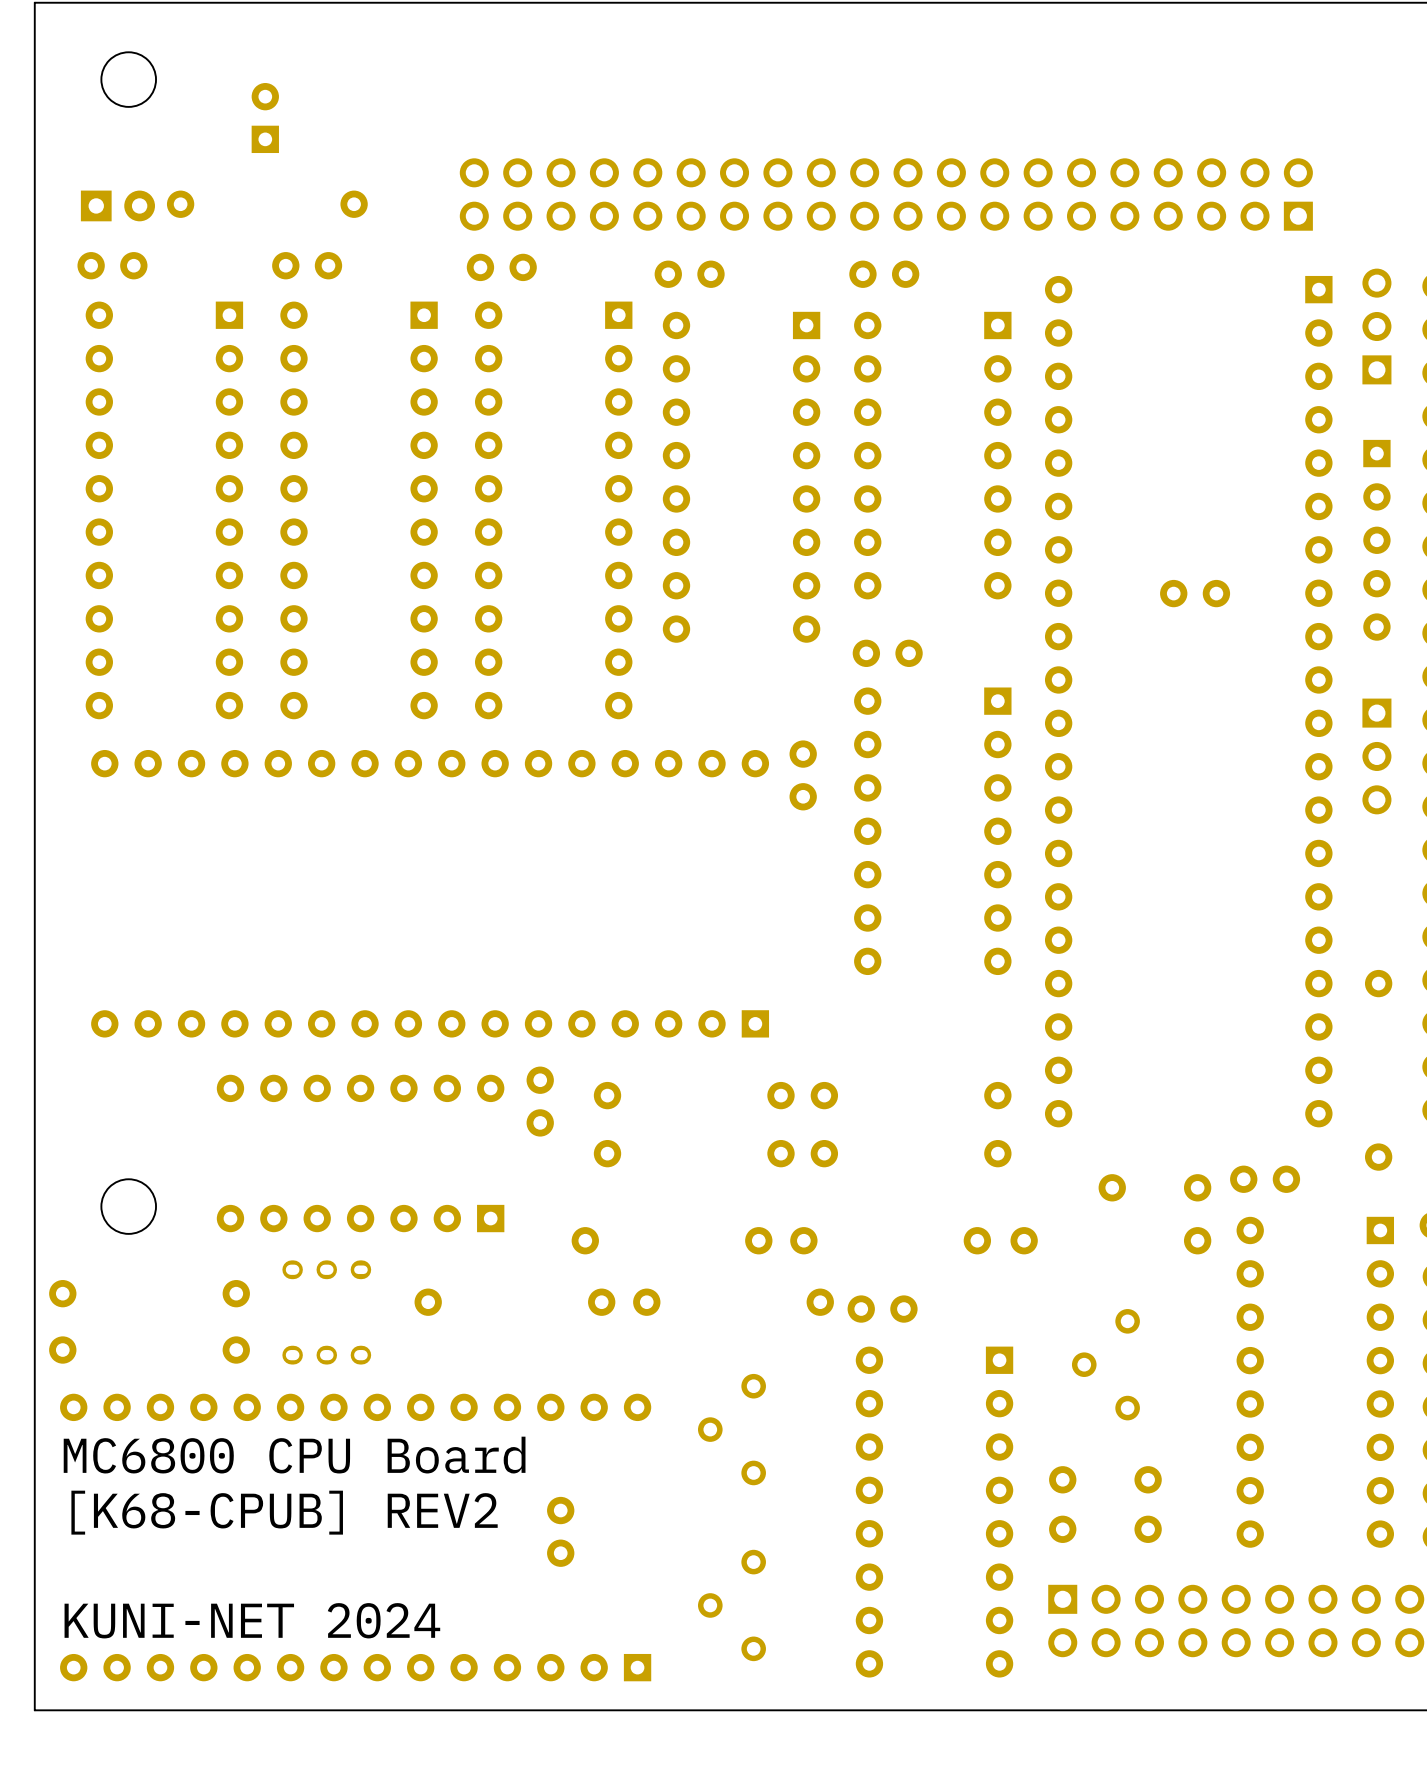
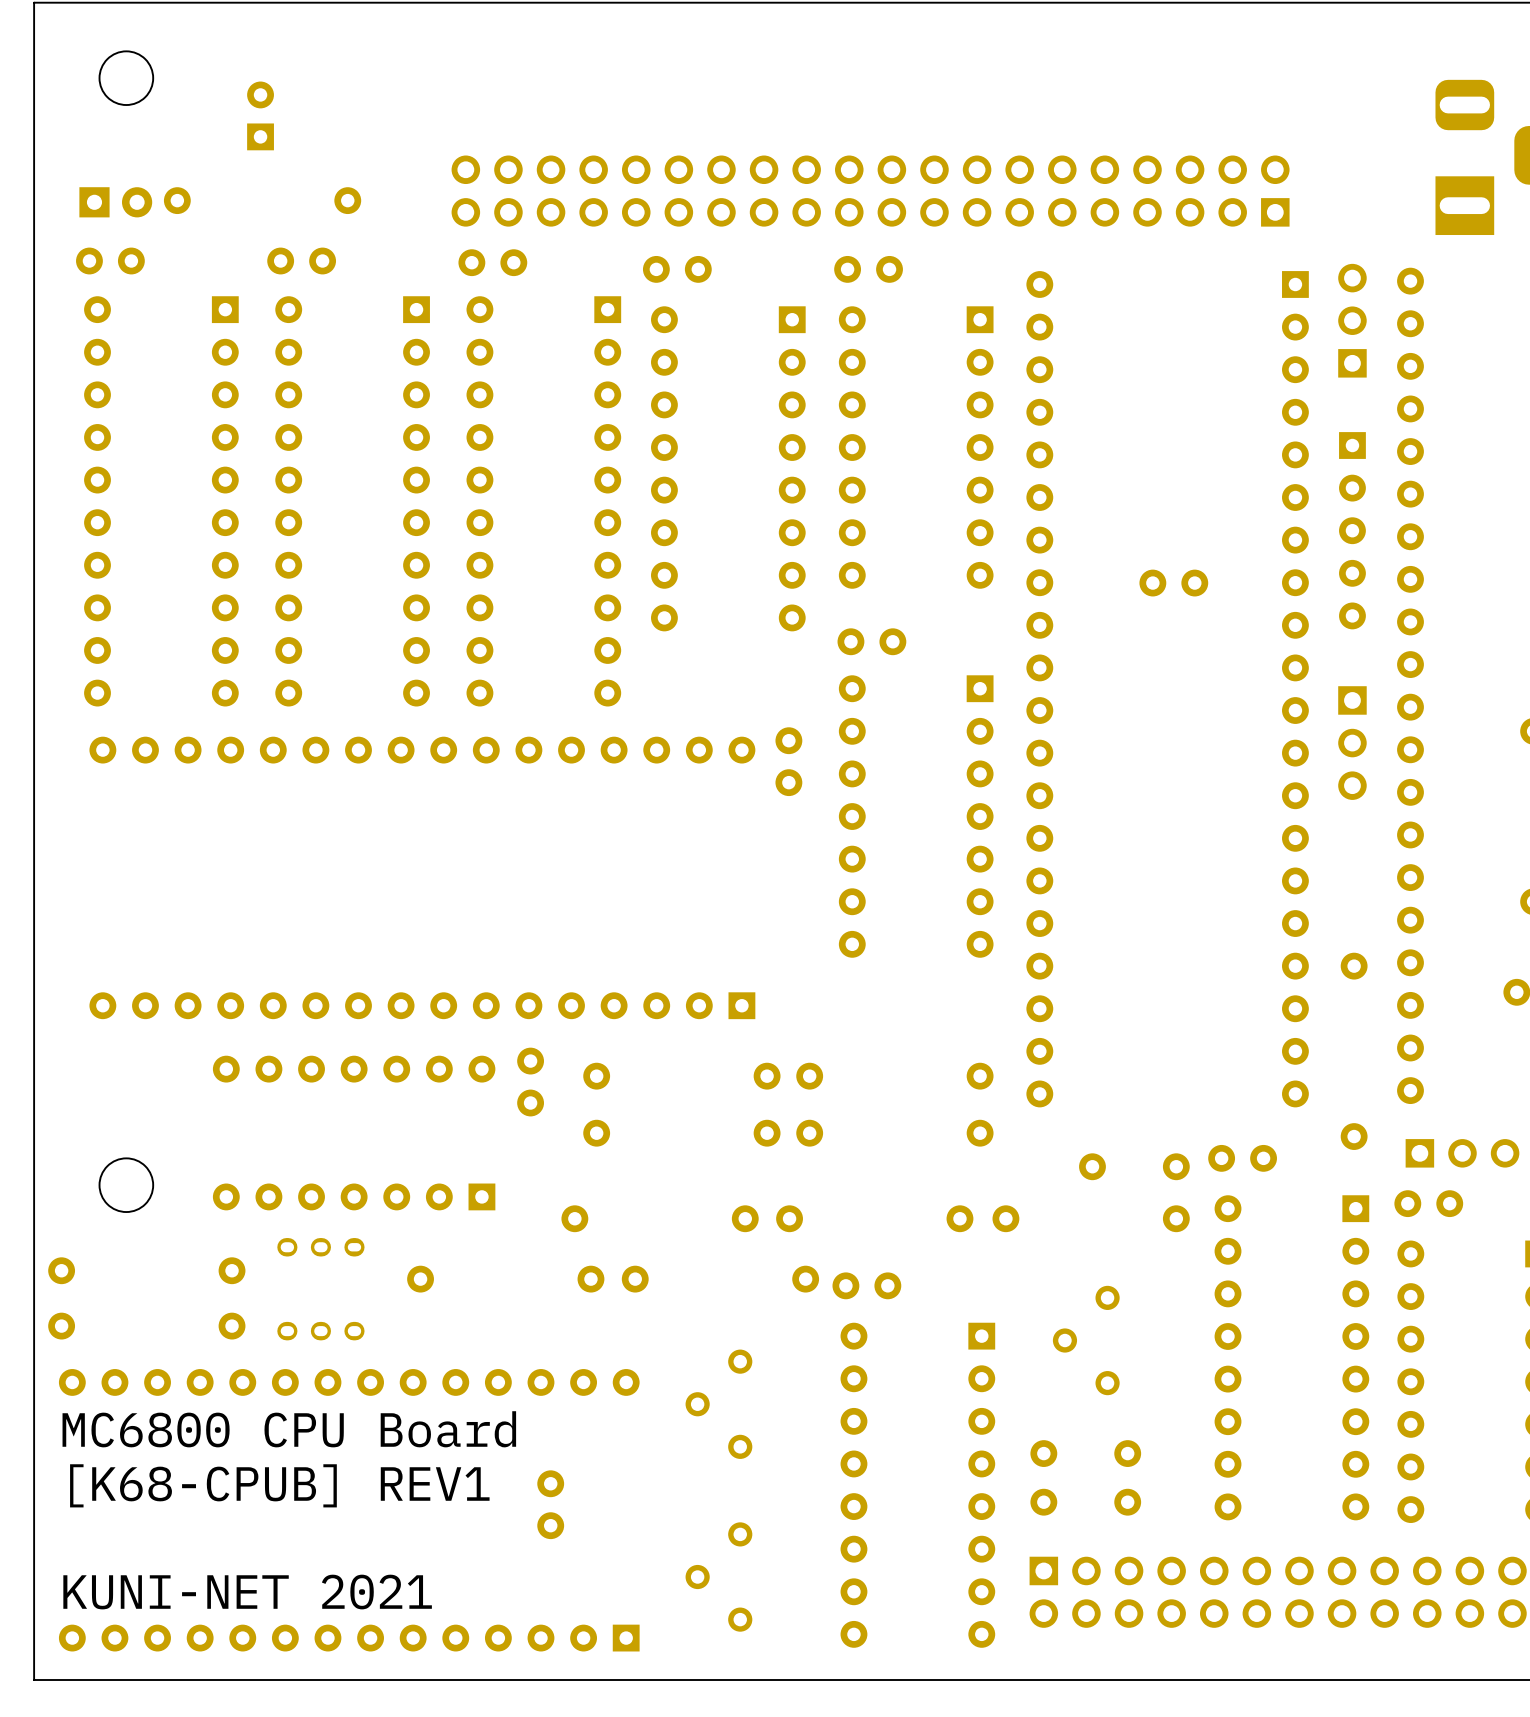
text: [K68-CPUB] REV2 (284, 1512) -> [K68-CPUB] REV1 (279, 1485)
text: KUNI-NET 2024 (252, 1620) -> KUNI-NET 2021 (247, 1592)

